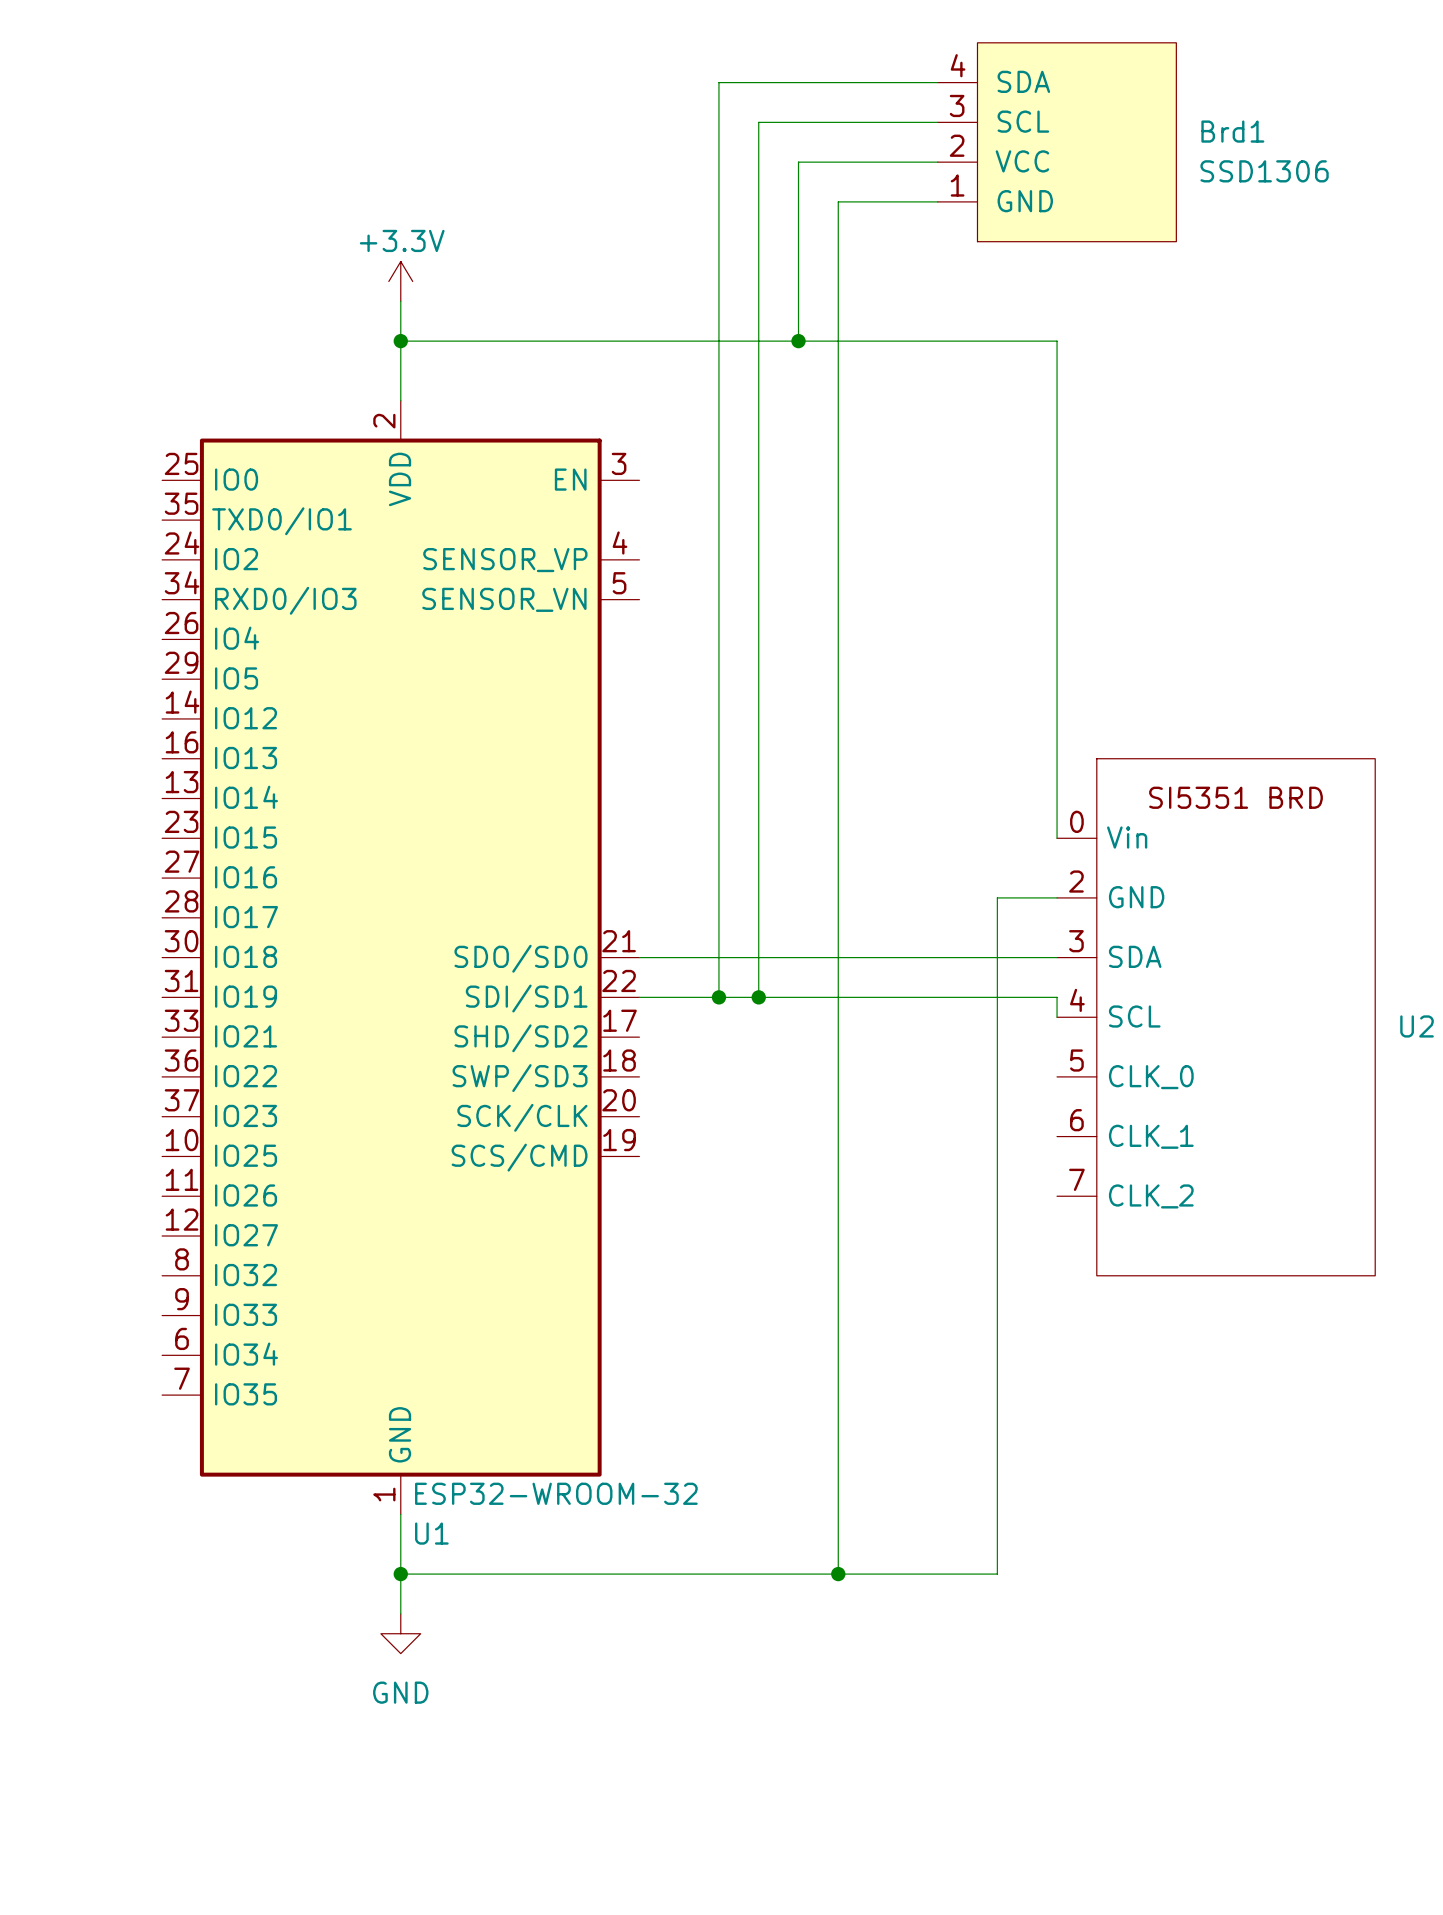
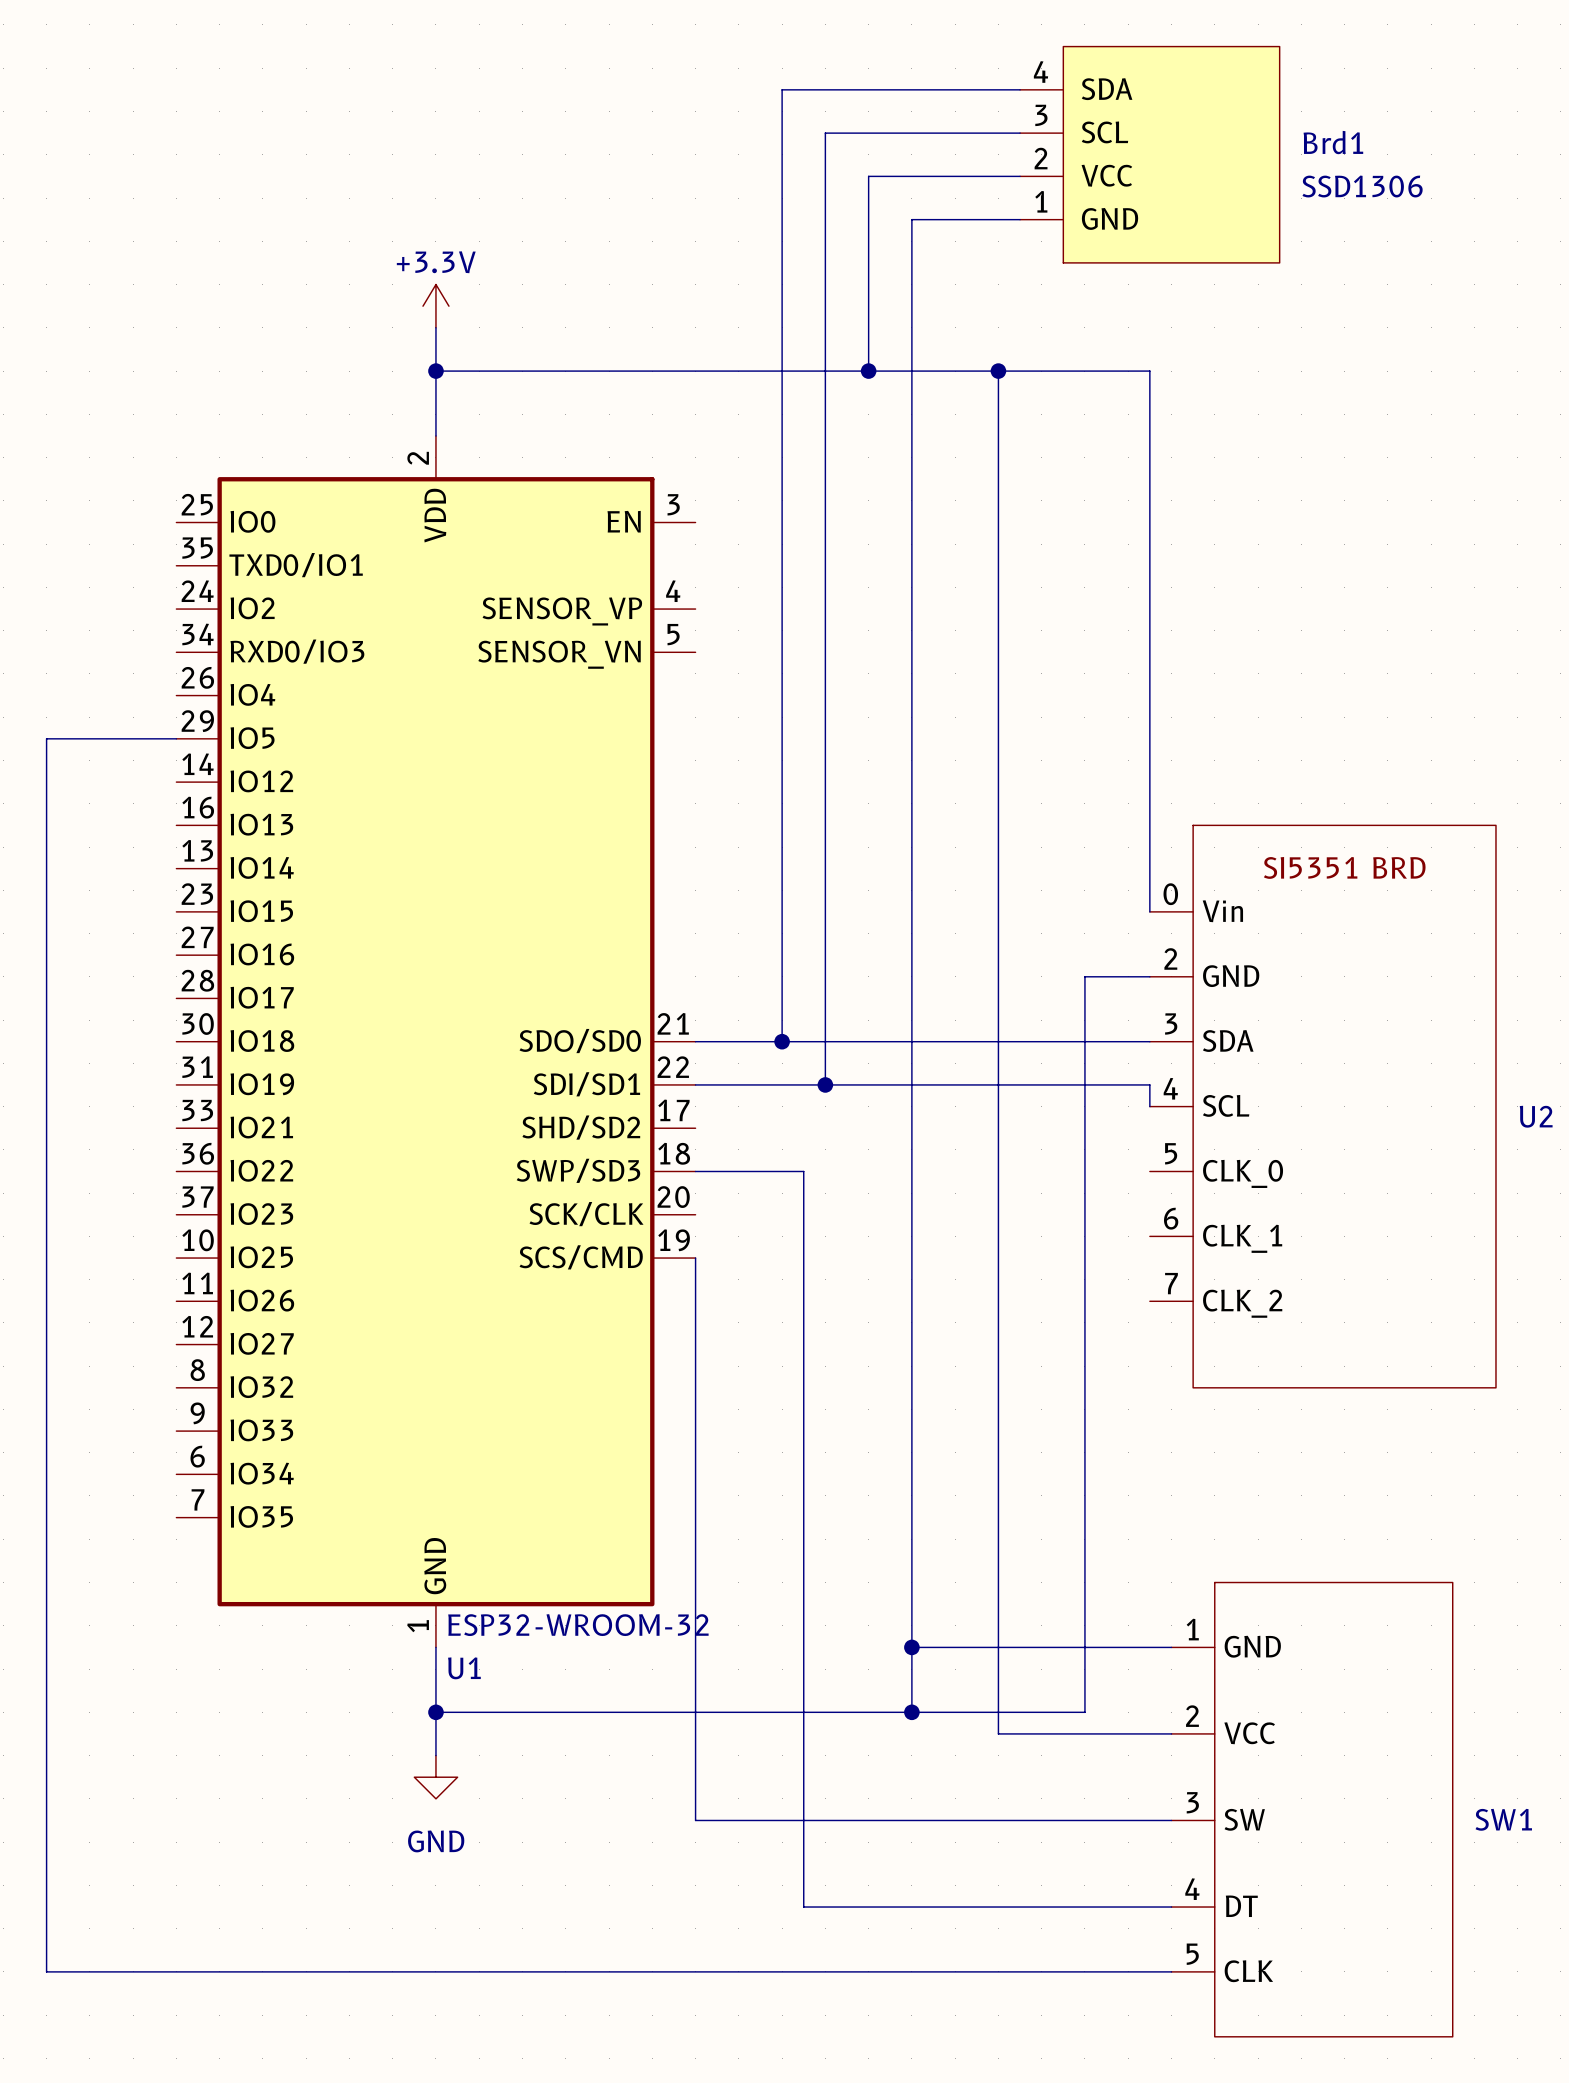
wire: none -> (998, 371) (998, 1733) (1171, 1733)
junction: none -> (998, 371)
wire: none -> (176, 738) (46, 738) (46, 1971) (1171, 1971)
wire: (718, 957) (718, 997) -> none
junction position: (718, 997) -> (782, 1041)
wire: none -> (695, 1171) (803, 1171) (803, 1907) (1171, 1907)
wire: none -> (695, 1258) (695, 1820) (1171, 1820)
wire: none -> (911, 1647) (1171, 1647)
junction: none -> (911, 1647)
SW1: none -> (1312, 1809)

